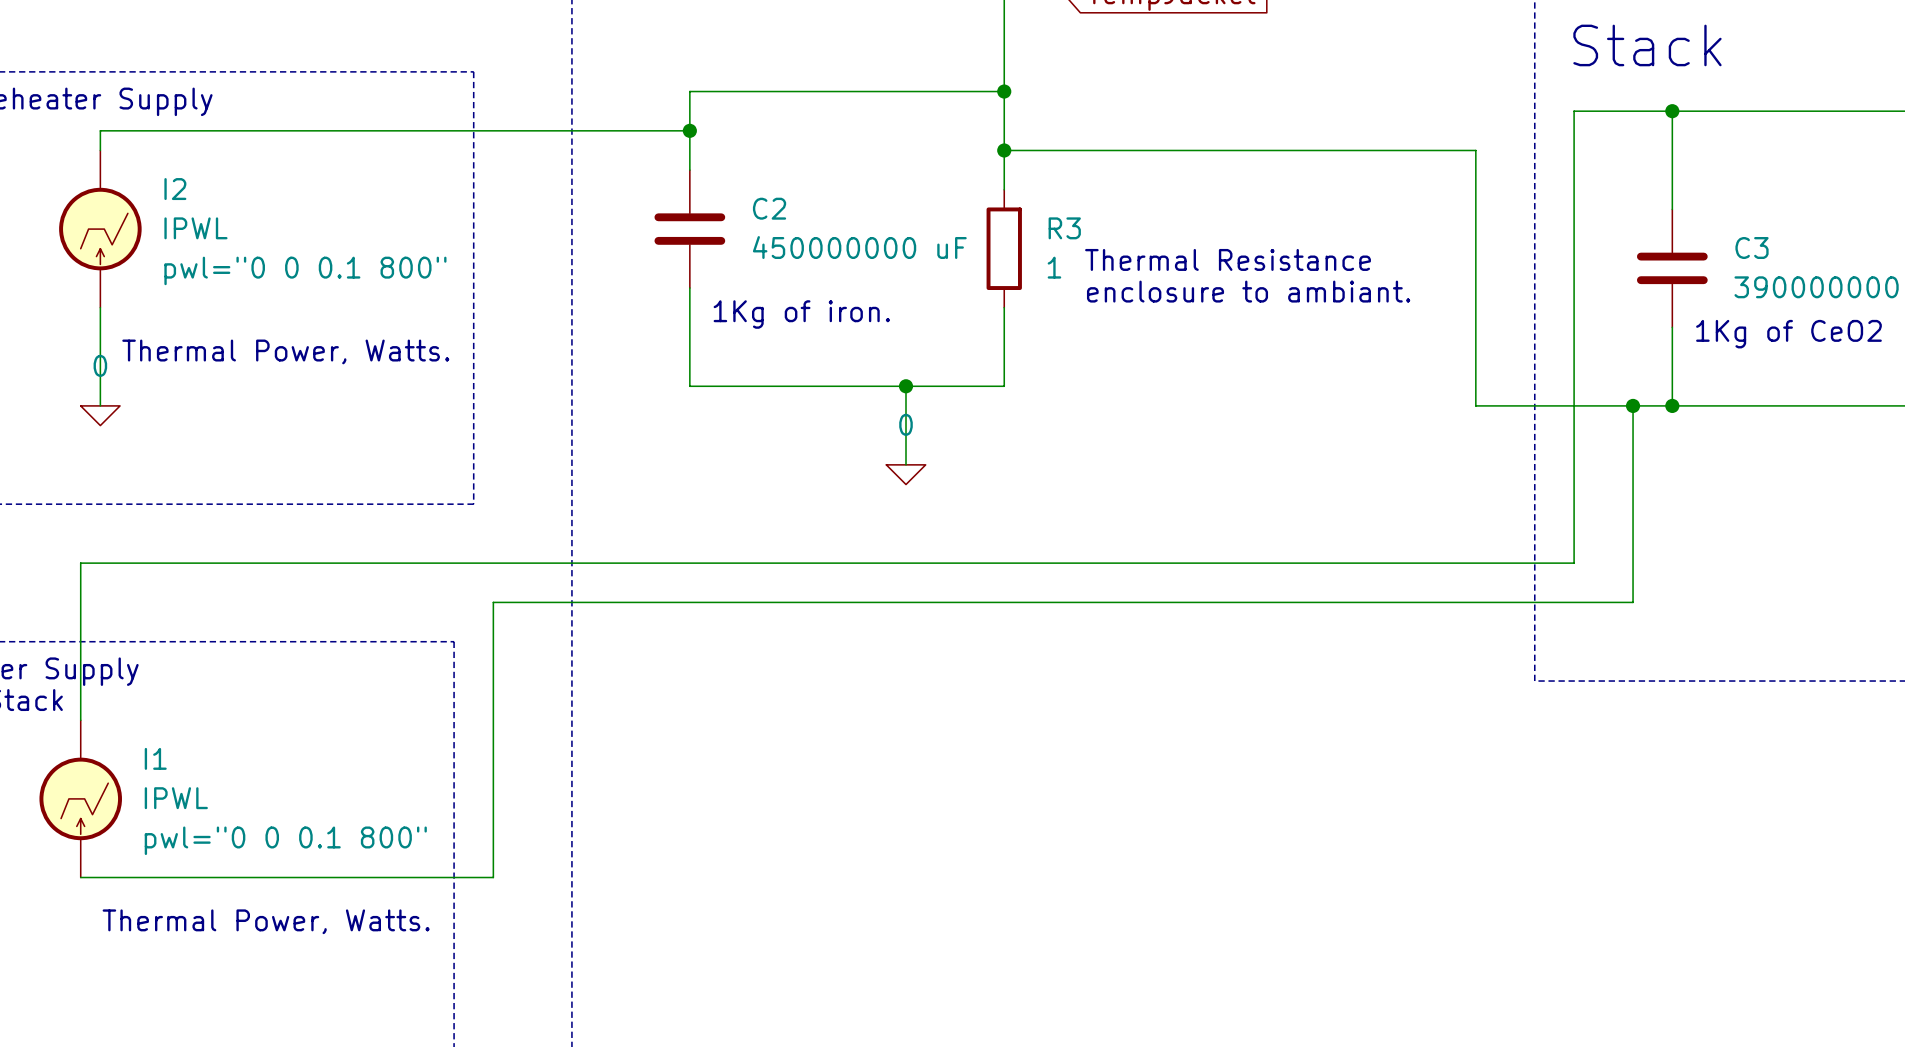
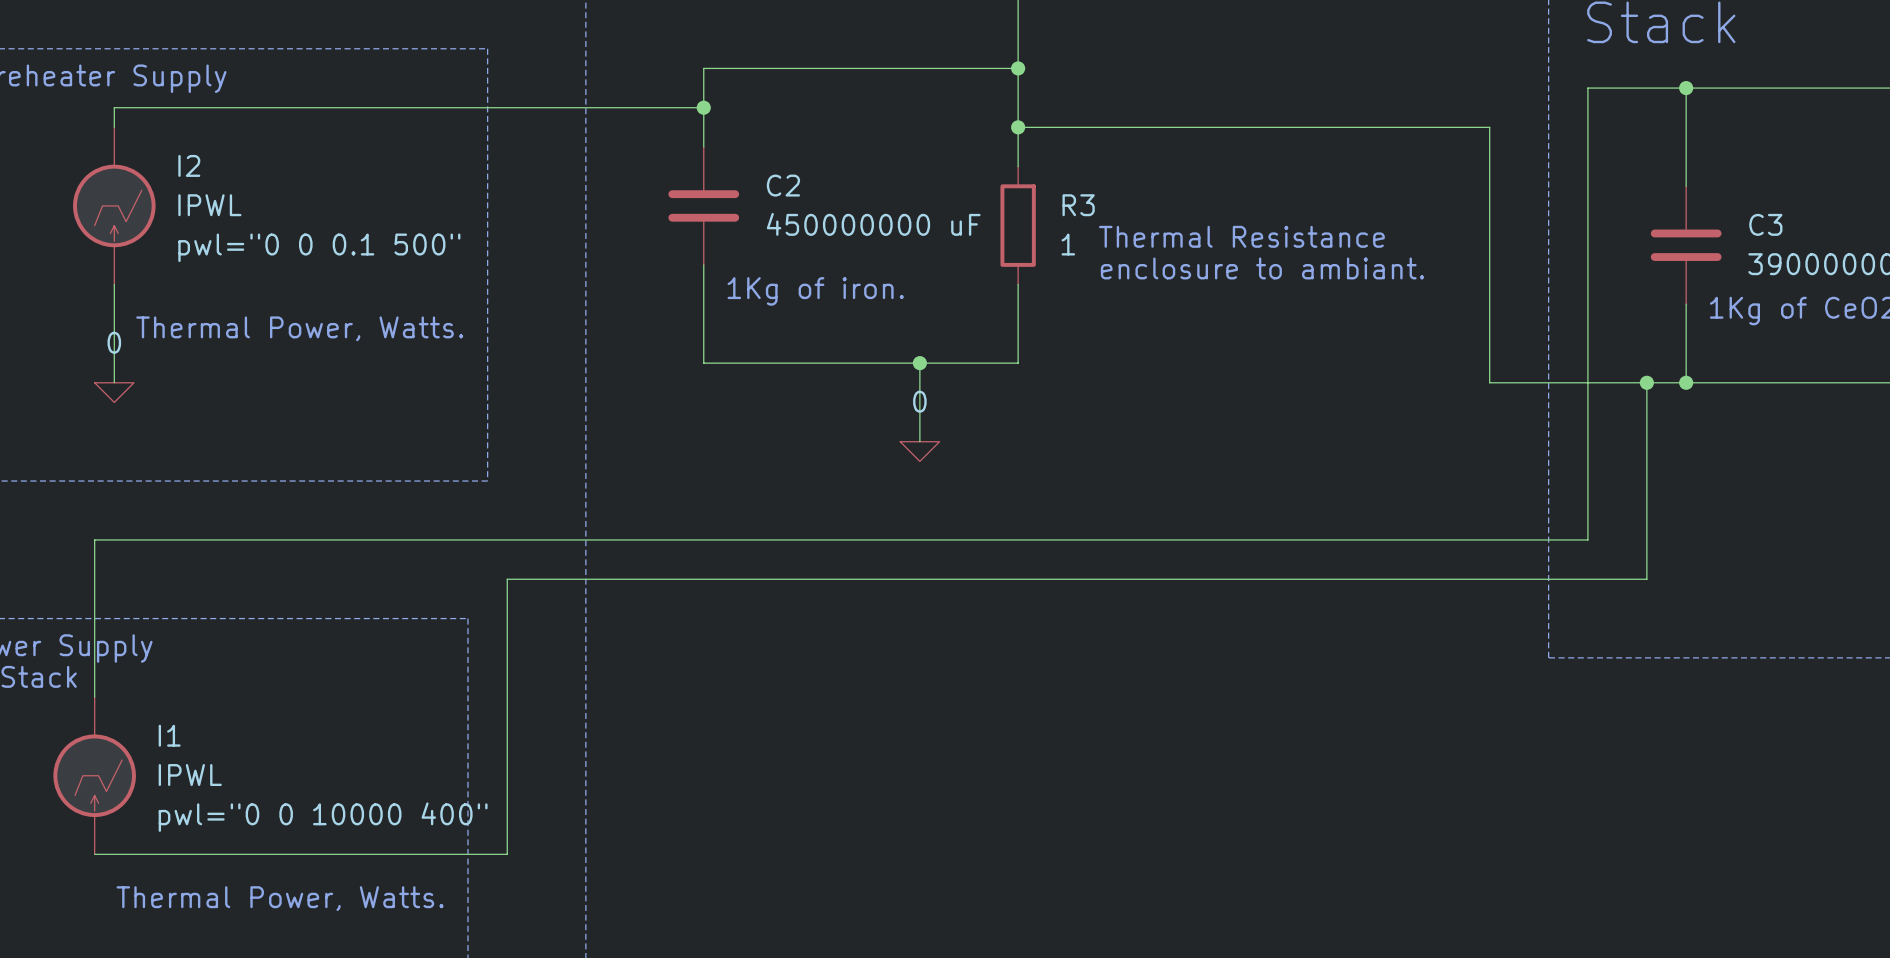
I2 text: pwl="0 0 0.1 800" (305, 270) -> pwl="0 0 0.1 500" (319, 247)
I1 text: pwl="0 0 0.1 800" (285, 840) -> pwl="0 0 10000 400" (323, 817)

